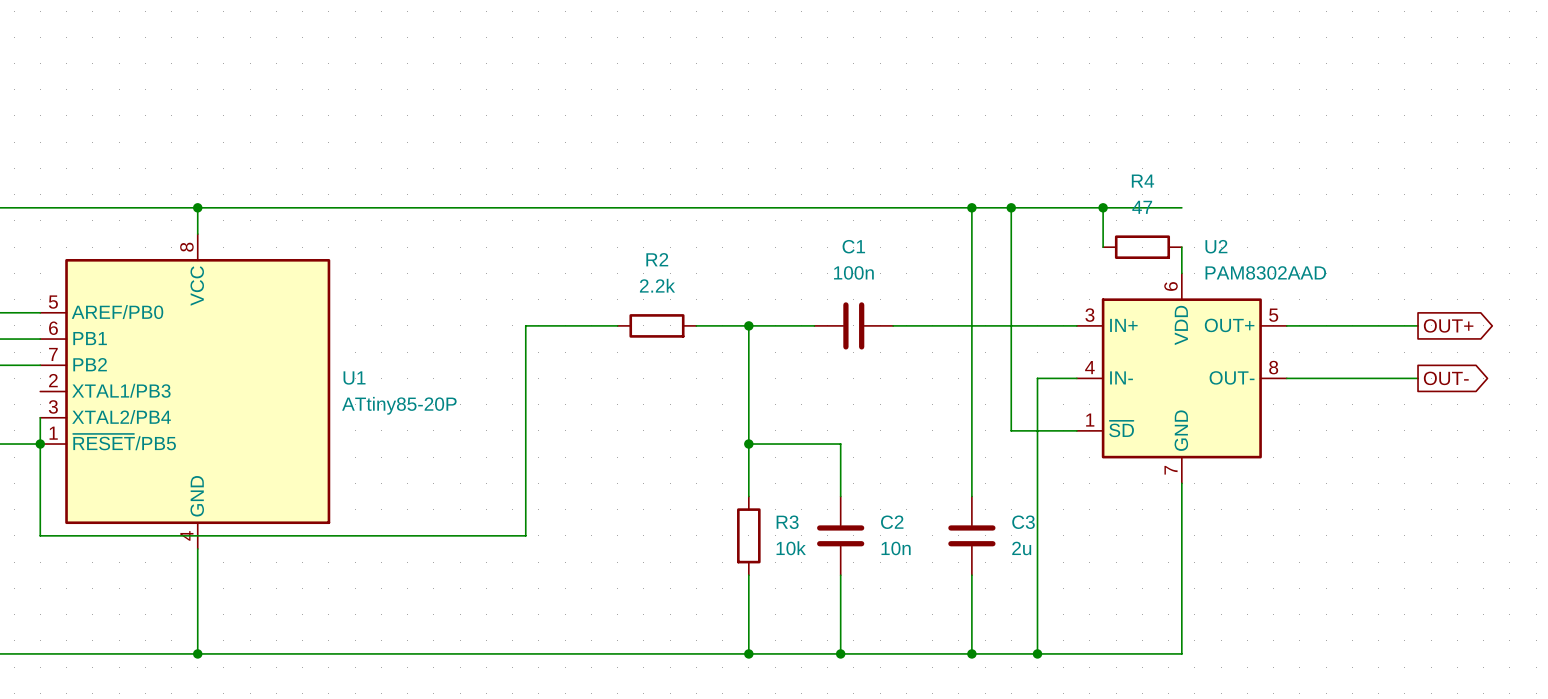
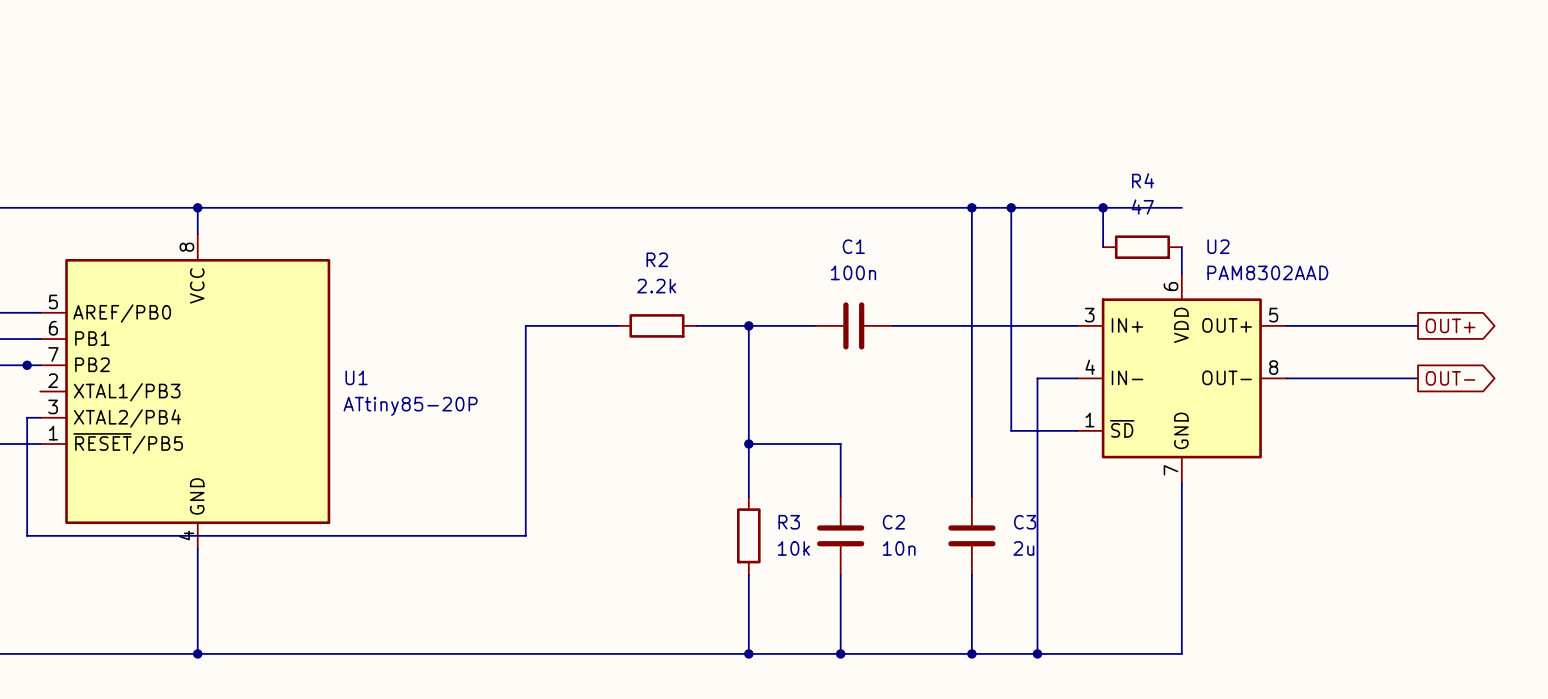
junction: none -> (27, 365)
wire: (40, 417) (40, 535) -> (40, 417) (27, 417) (27, 535) (40, 535)
junction: (40, 444) -> none

